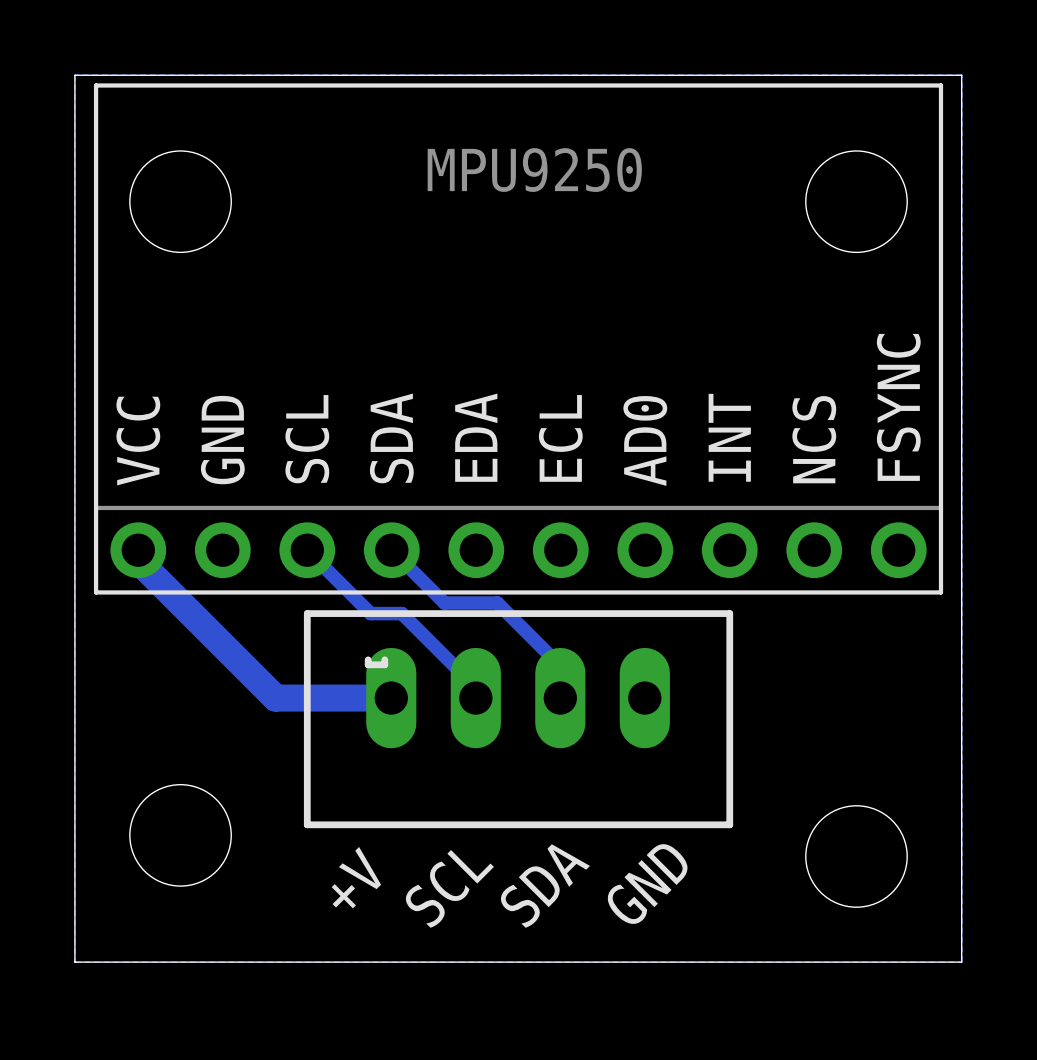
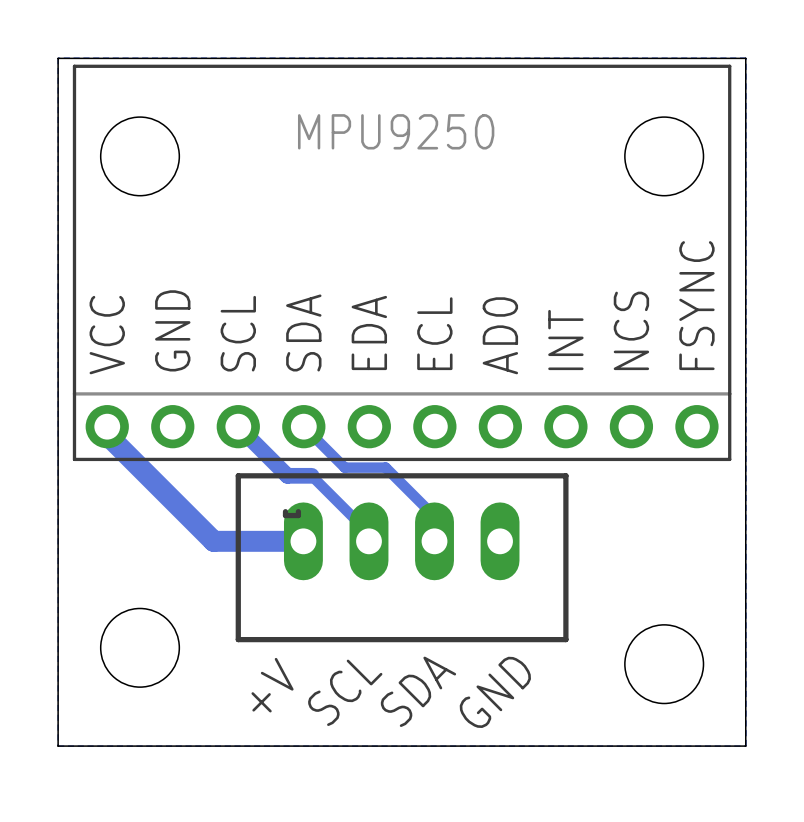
bottom track width: thin (307, 550) (370, 613) (401, 613) -> thick (238, 426) (287, 475) (311, 475)

